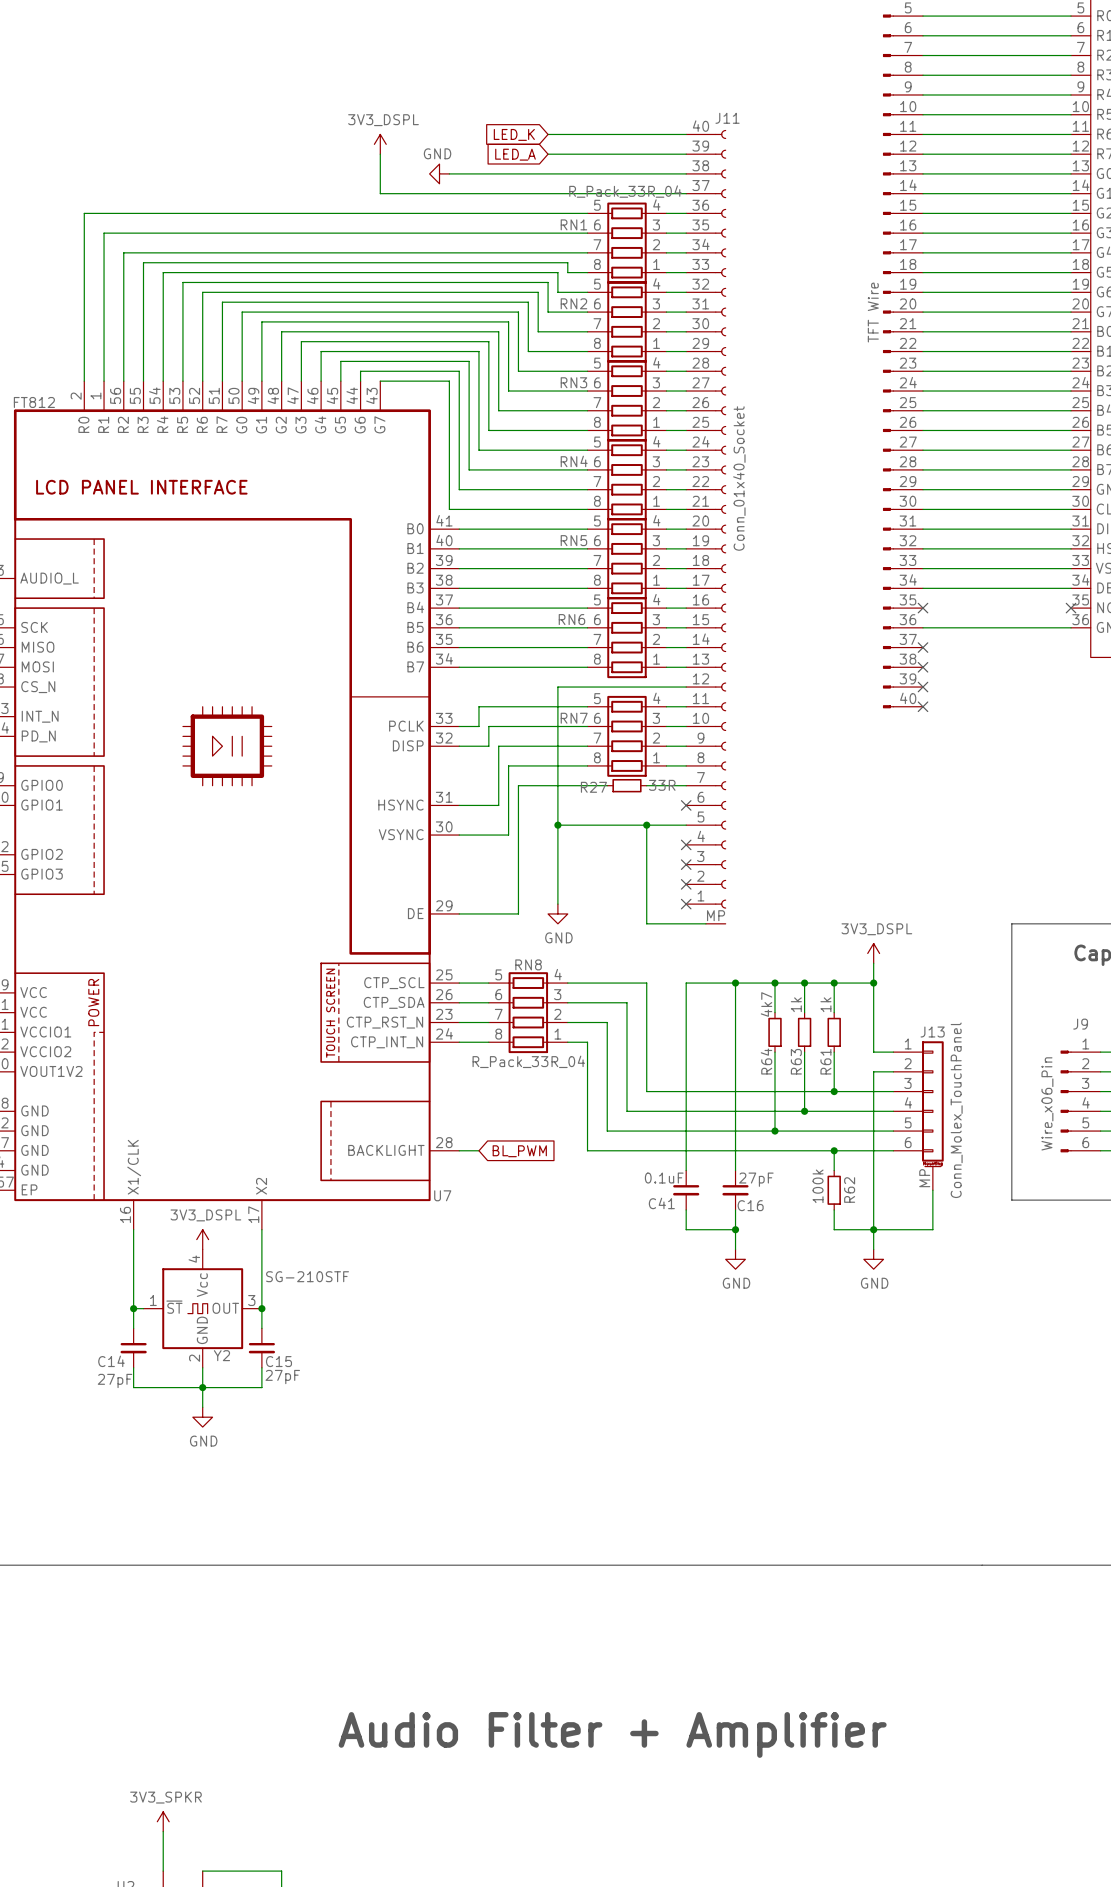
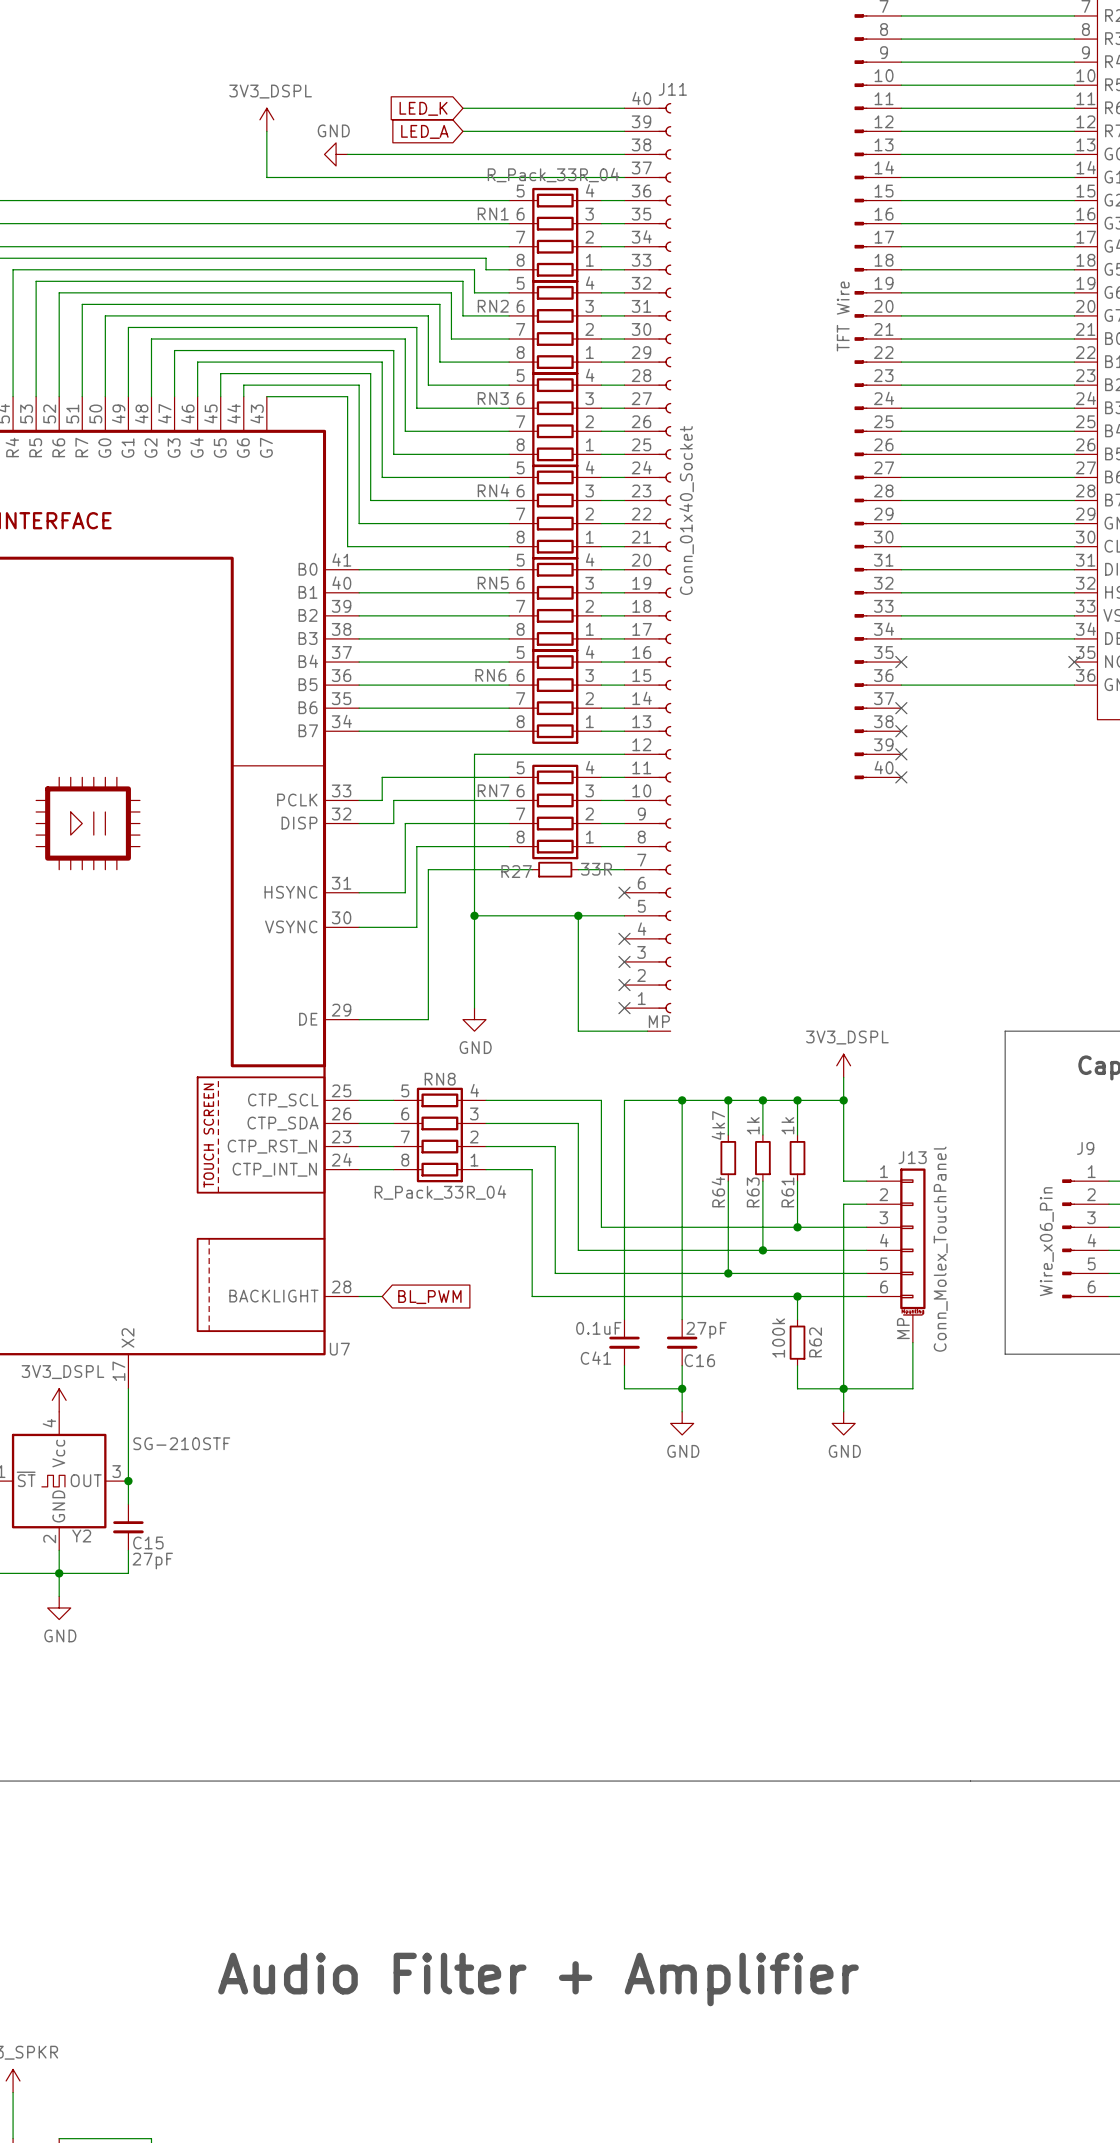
wire: (646, 983) (646, 1002) -> (555, 1123) (578, 1123)
wire: none -> (578, 1100) (601, 1100) (601, 1227)
wire: (626, 1002) (626, 1022) -> none
wire: (607, 1022) (607, 1042) -> (532, 1146) (555, 1146)
wire: (587, 1042) (587, 1150) (607, 1150) -> (509, 1169) (532, 1169)
wire: (646, 1091) (666, 1091) -> (578, 1227) (578, 1250)
wire: (626, 1111) (646, 1111) -> (555, 1250) (555, 1273)
wire: (607, 1131) (626, 1131) -> (532, 1273) (532, 1296)

